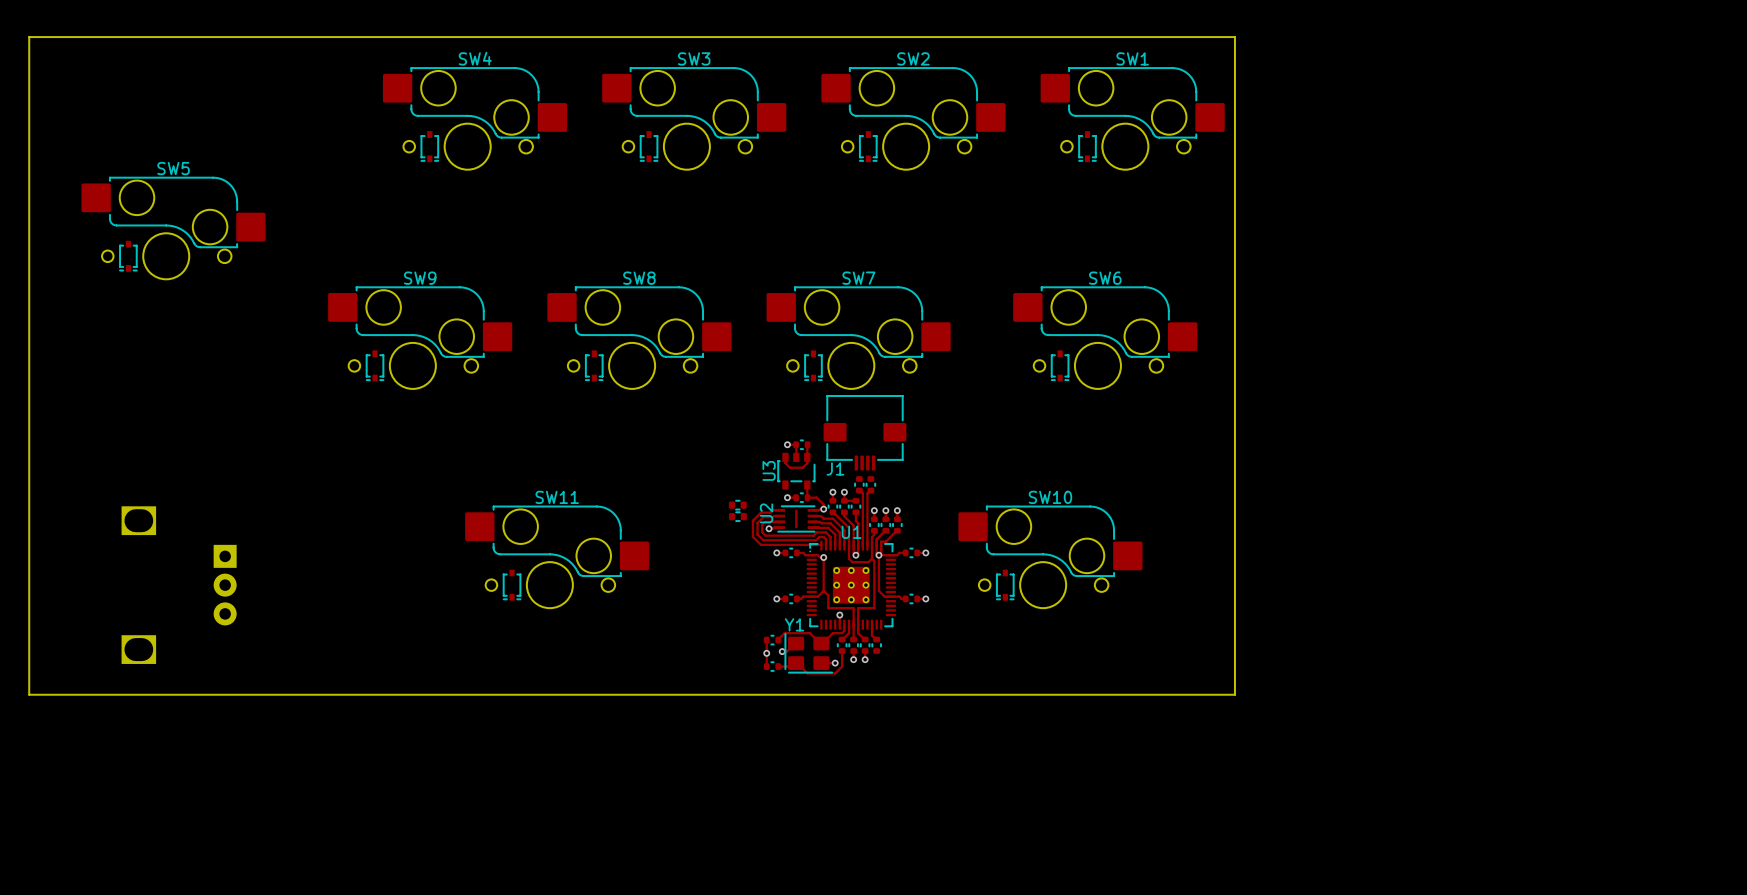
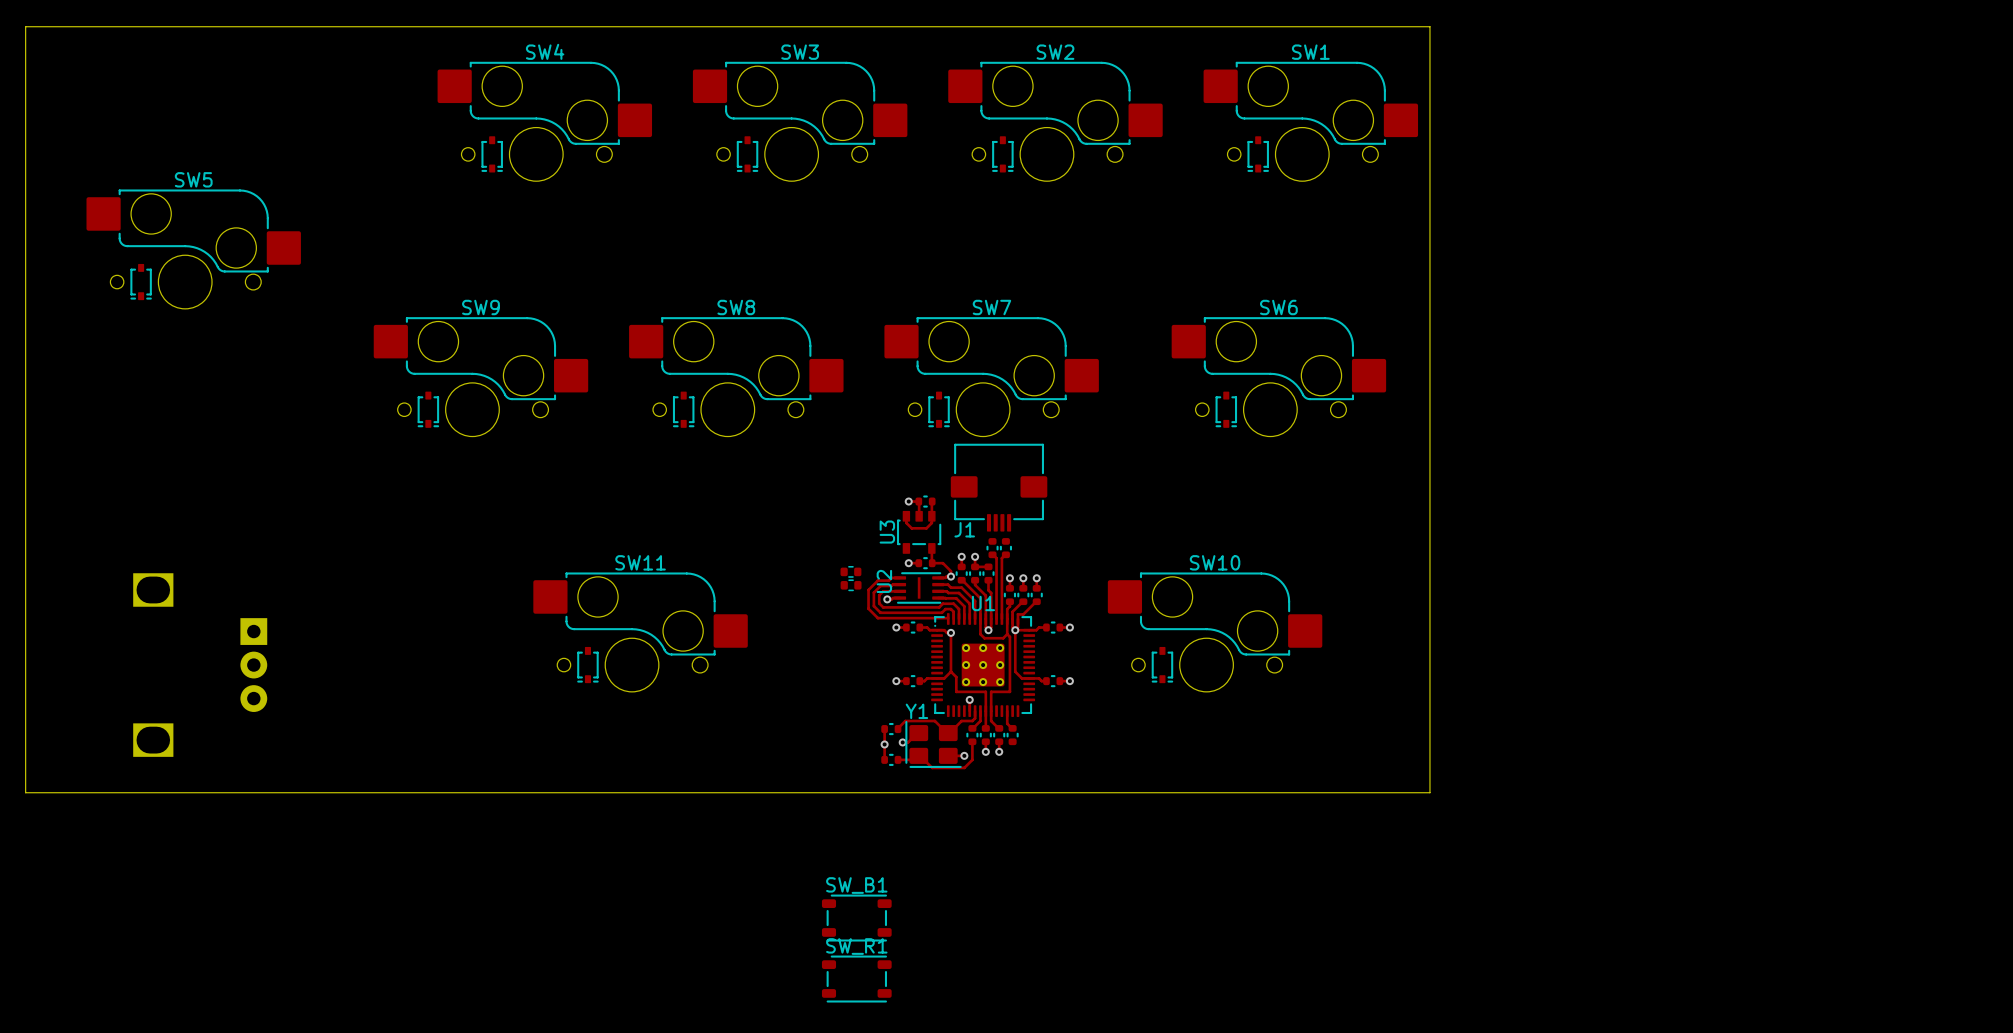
SW_B1: none -> (856, 918)
SW_R1: none -> (856, 979)

